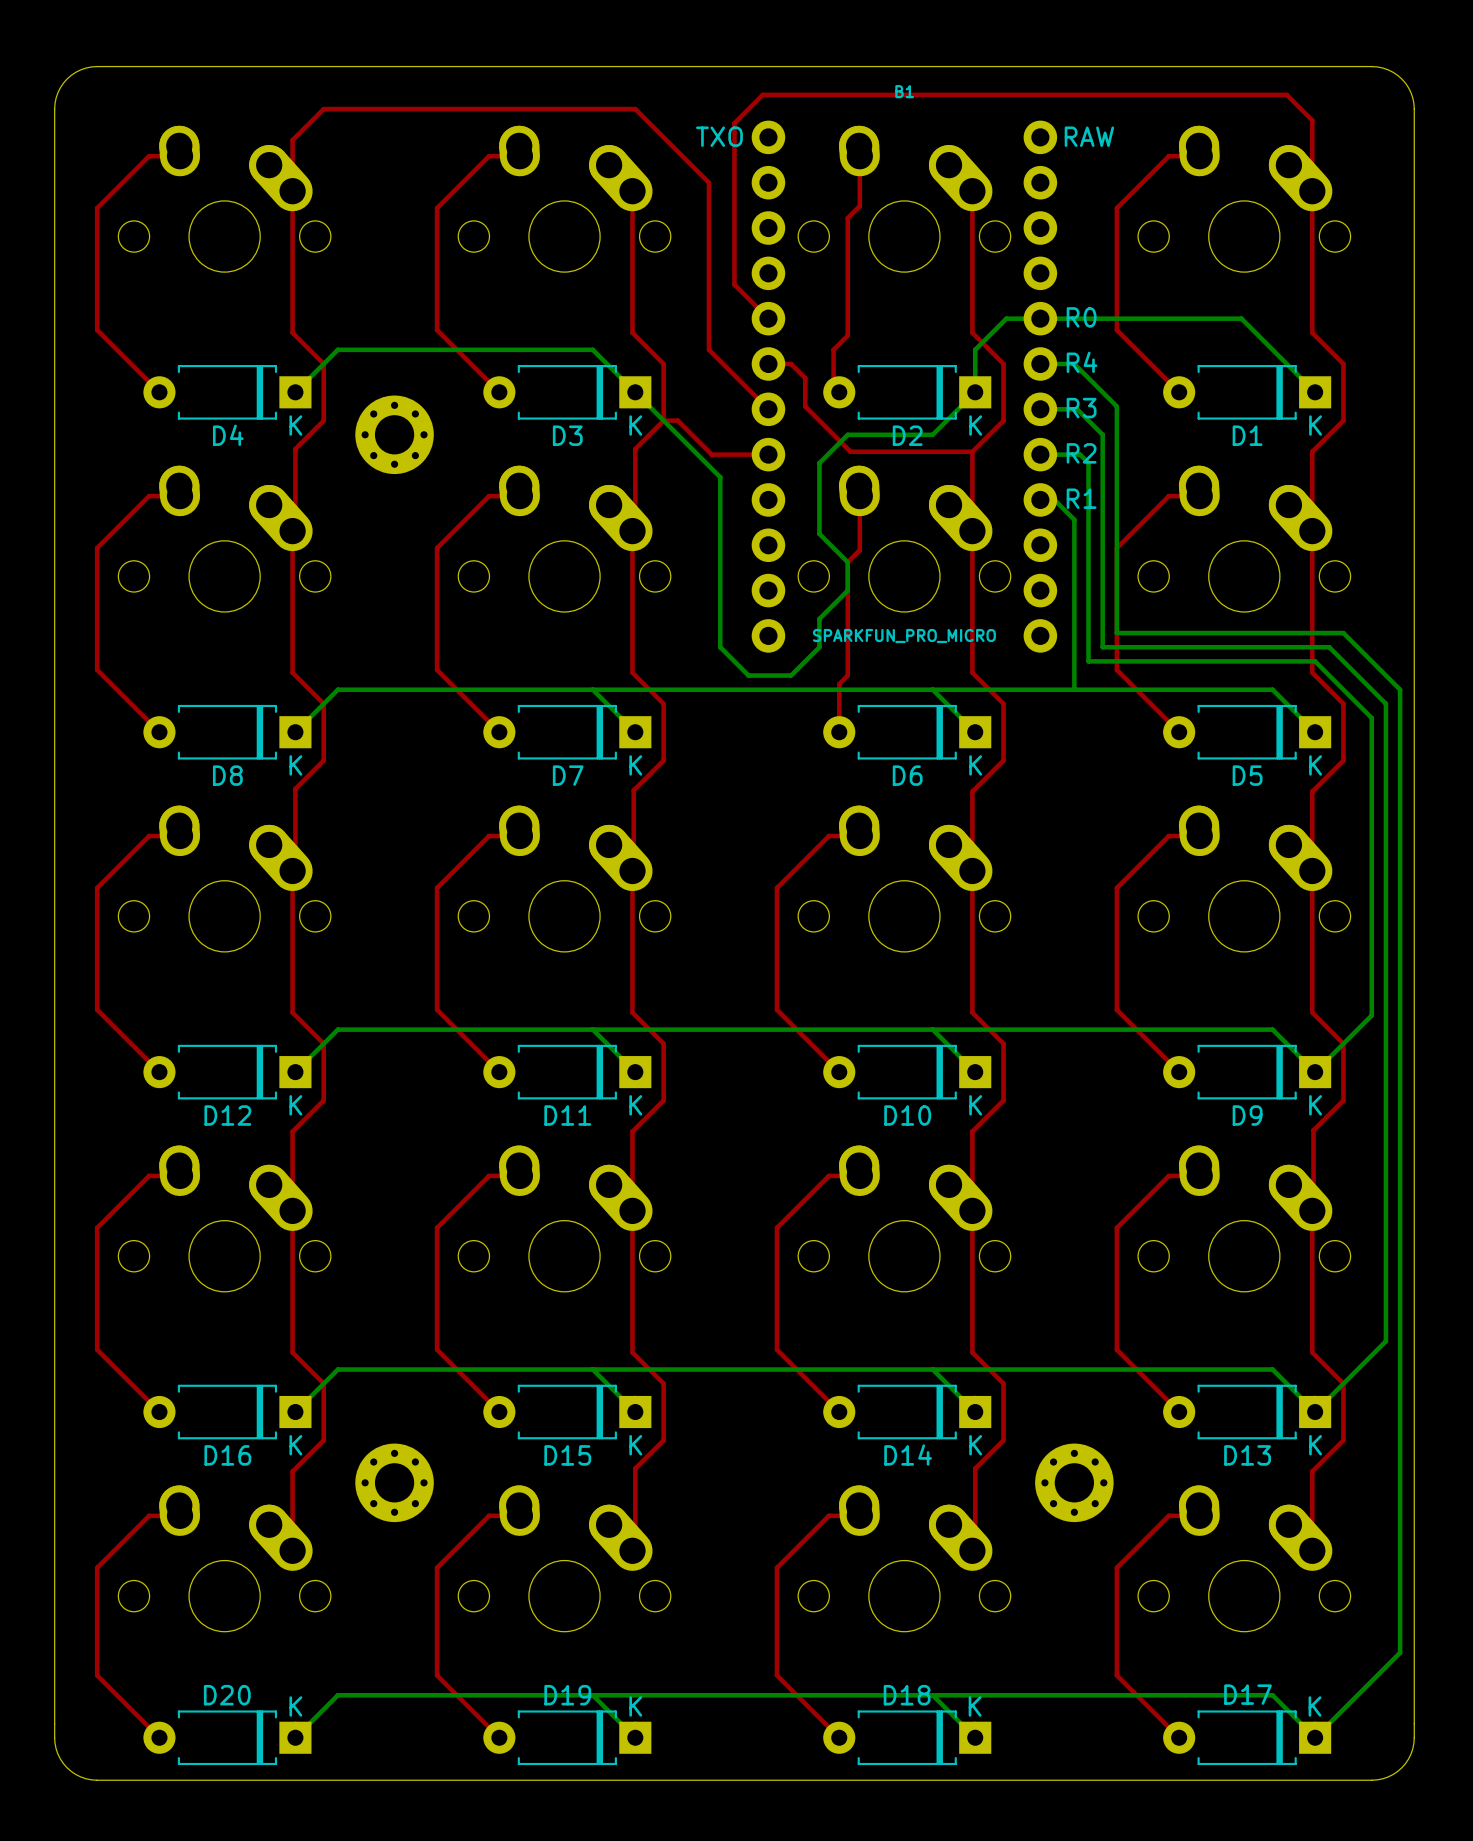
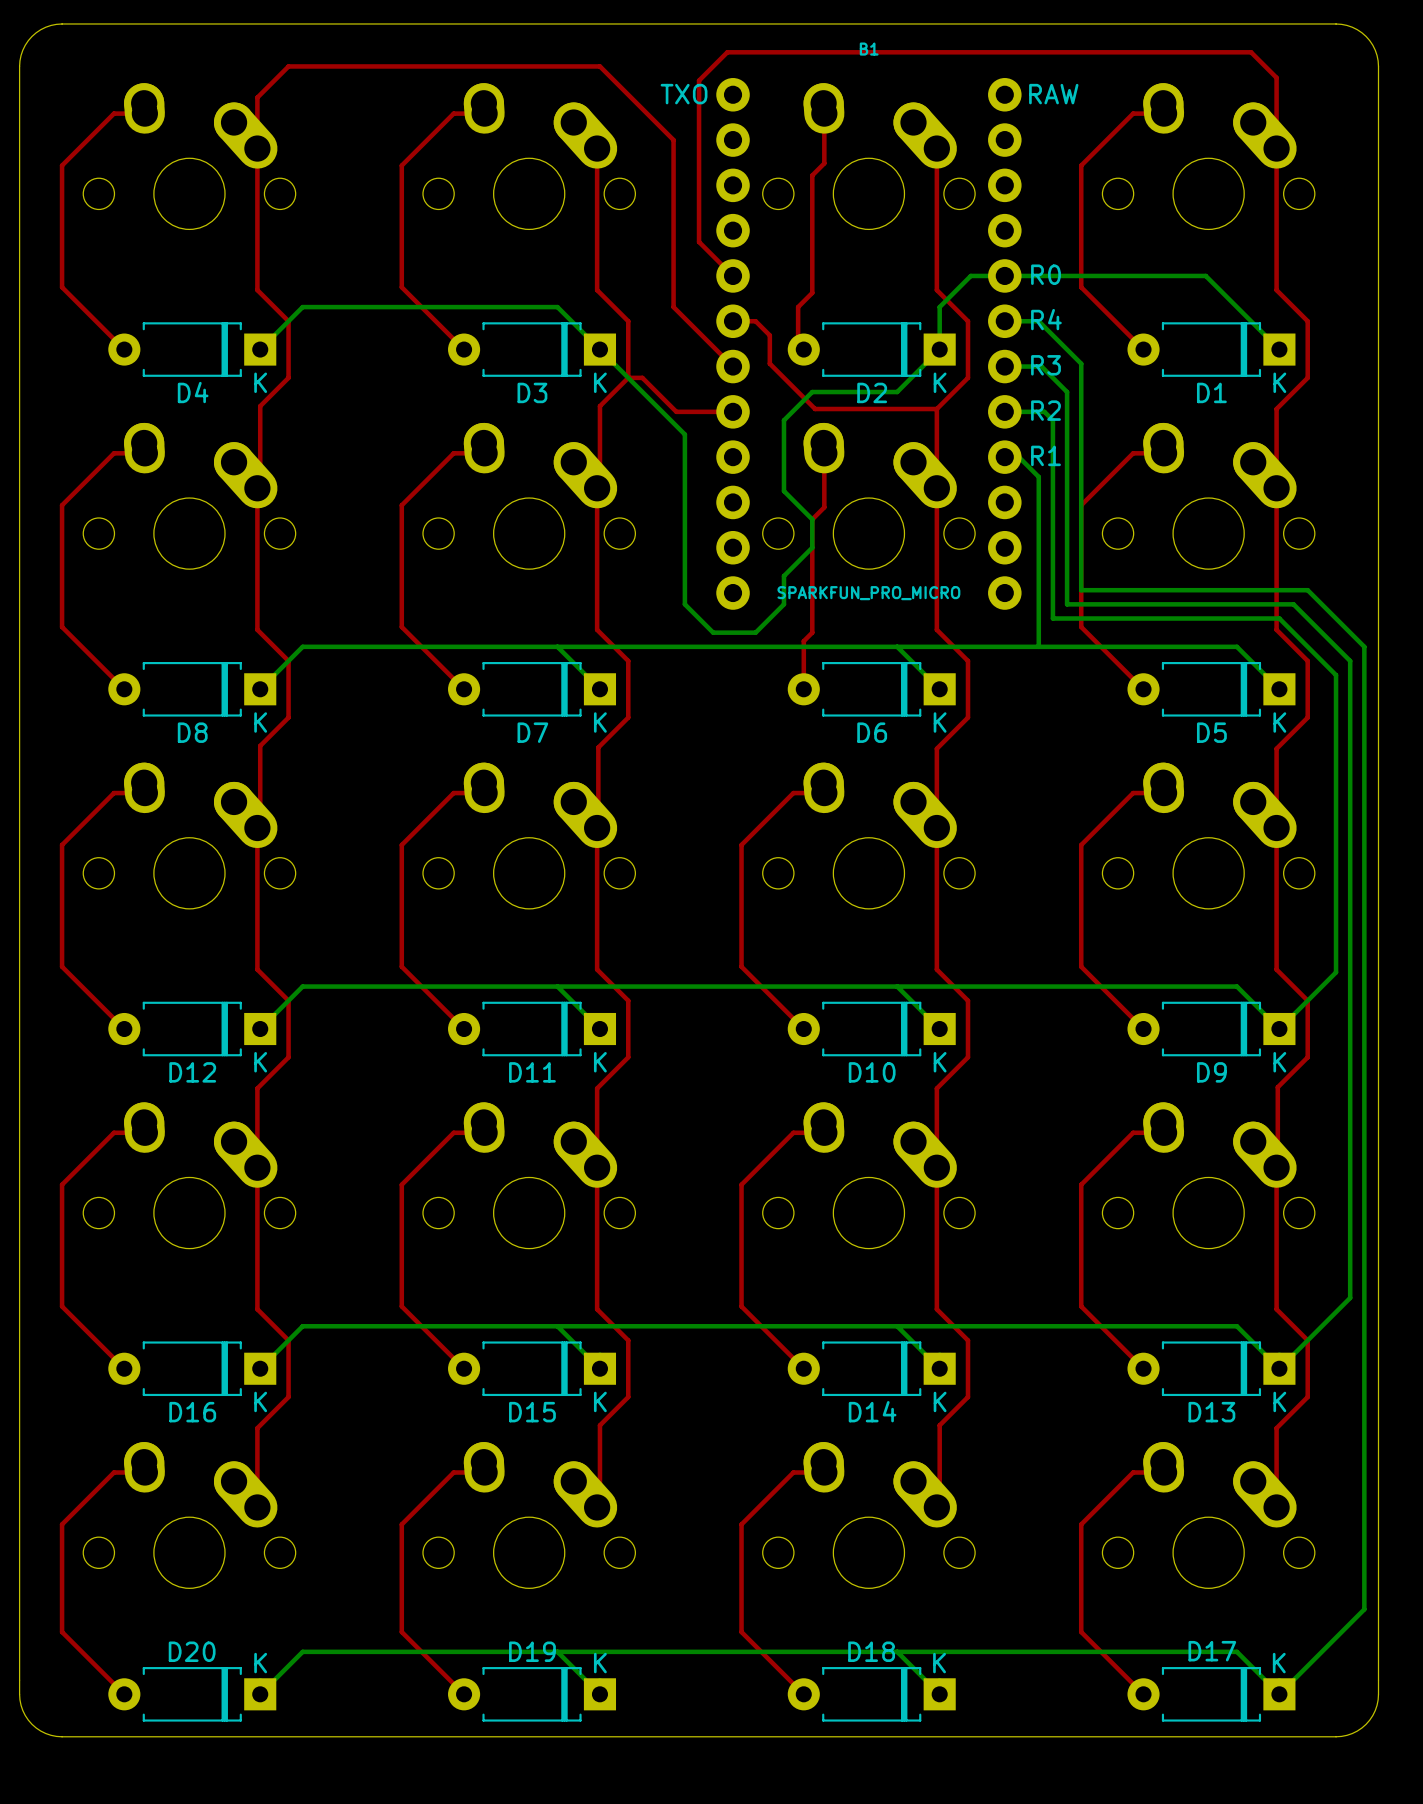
part: (394, 434) -> none
part: (394, 1482) -> none
part: (1074, 1482) -> none

